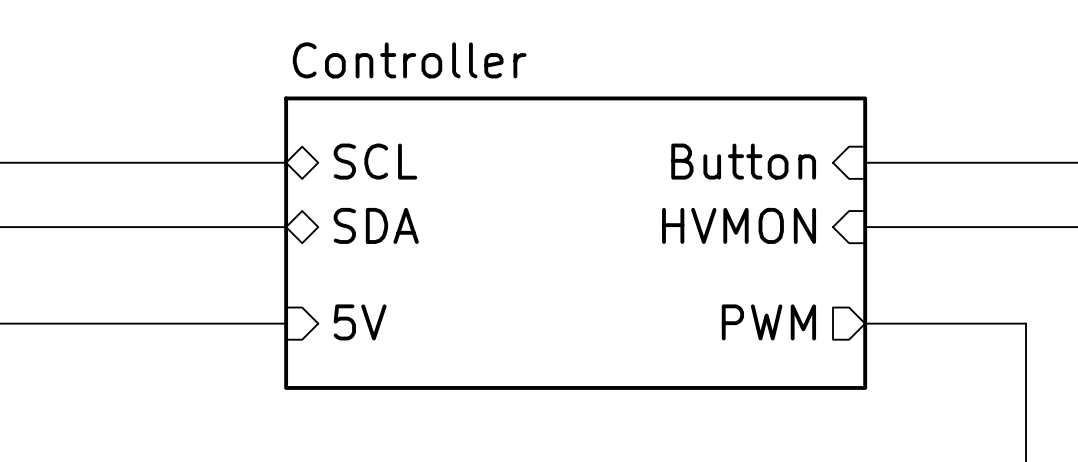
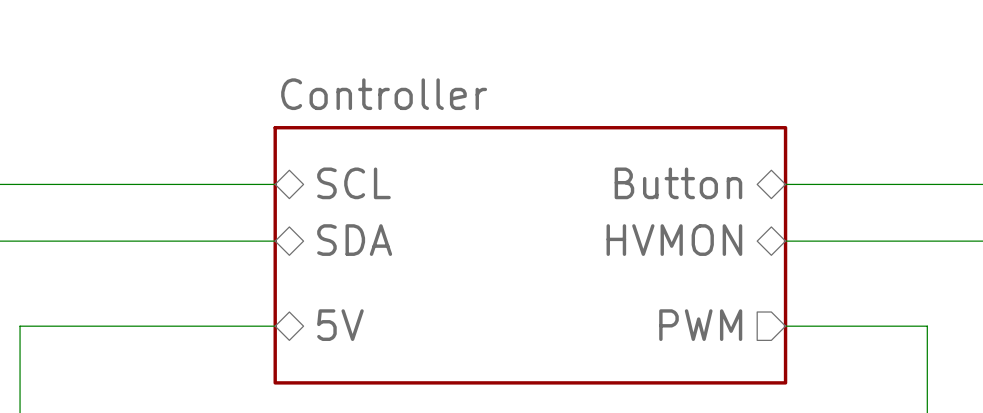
sheet pin shape: input (743, 161) -> bidirectional (678, 183)
sheet pin shape: input (739, 225) -> bidirectional (674, 240)
sheet pin shape: input (360, 322) -> bidirectional (340, 325)

